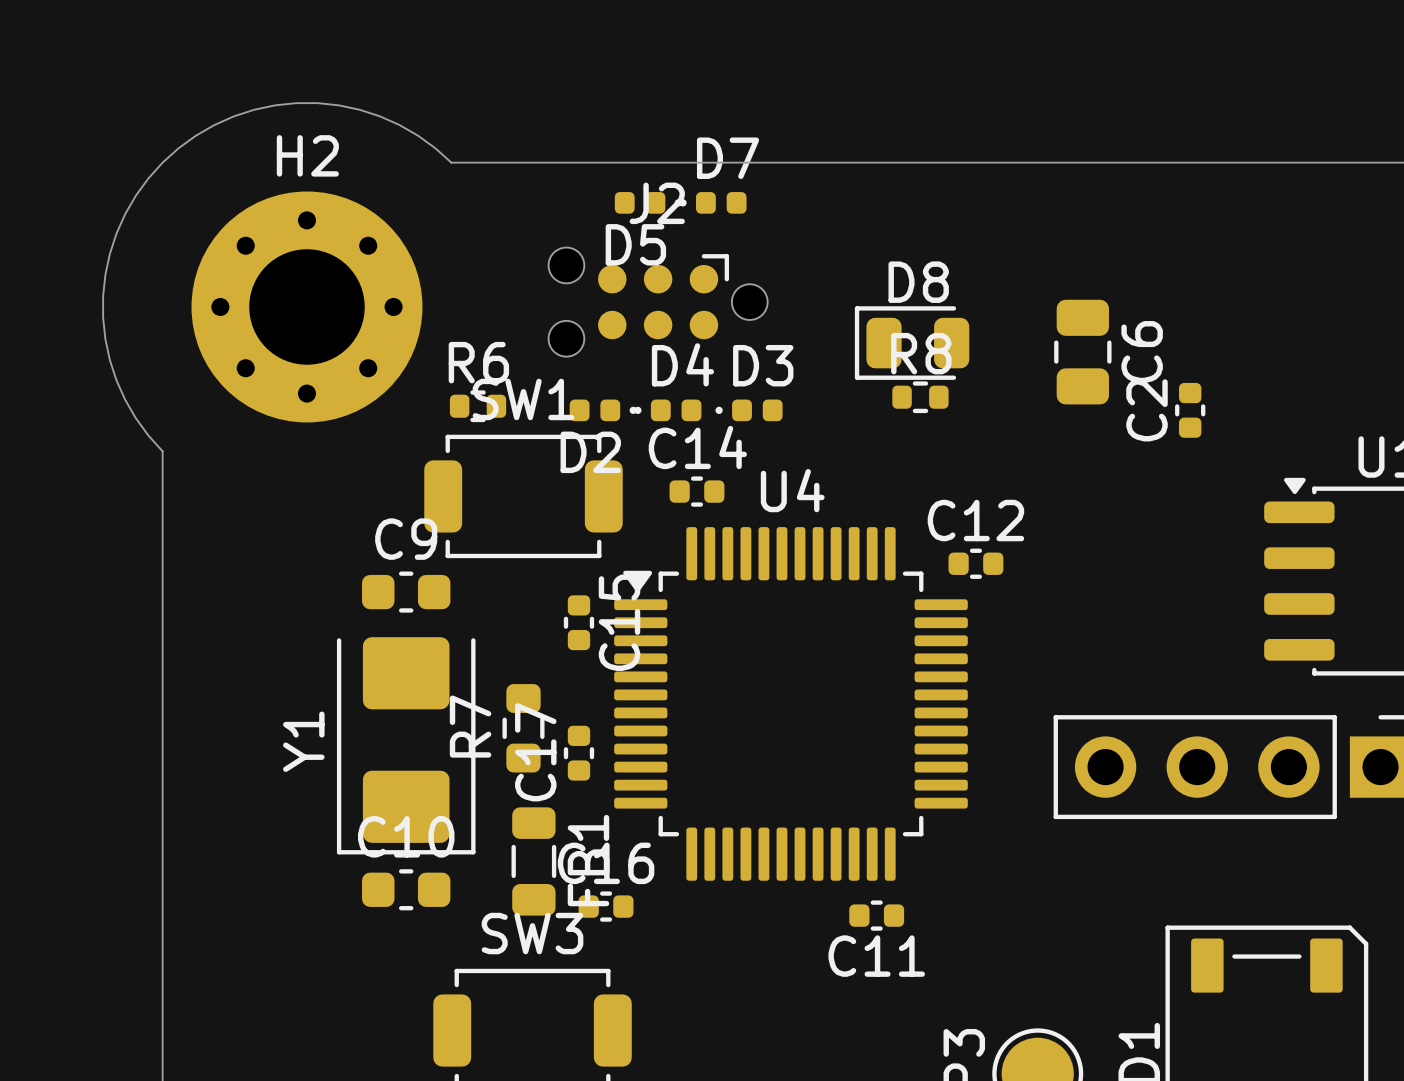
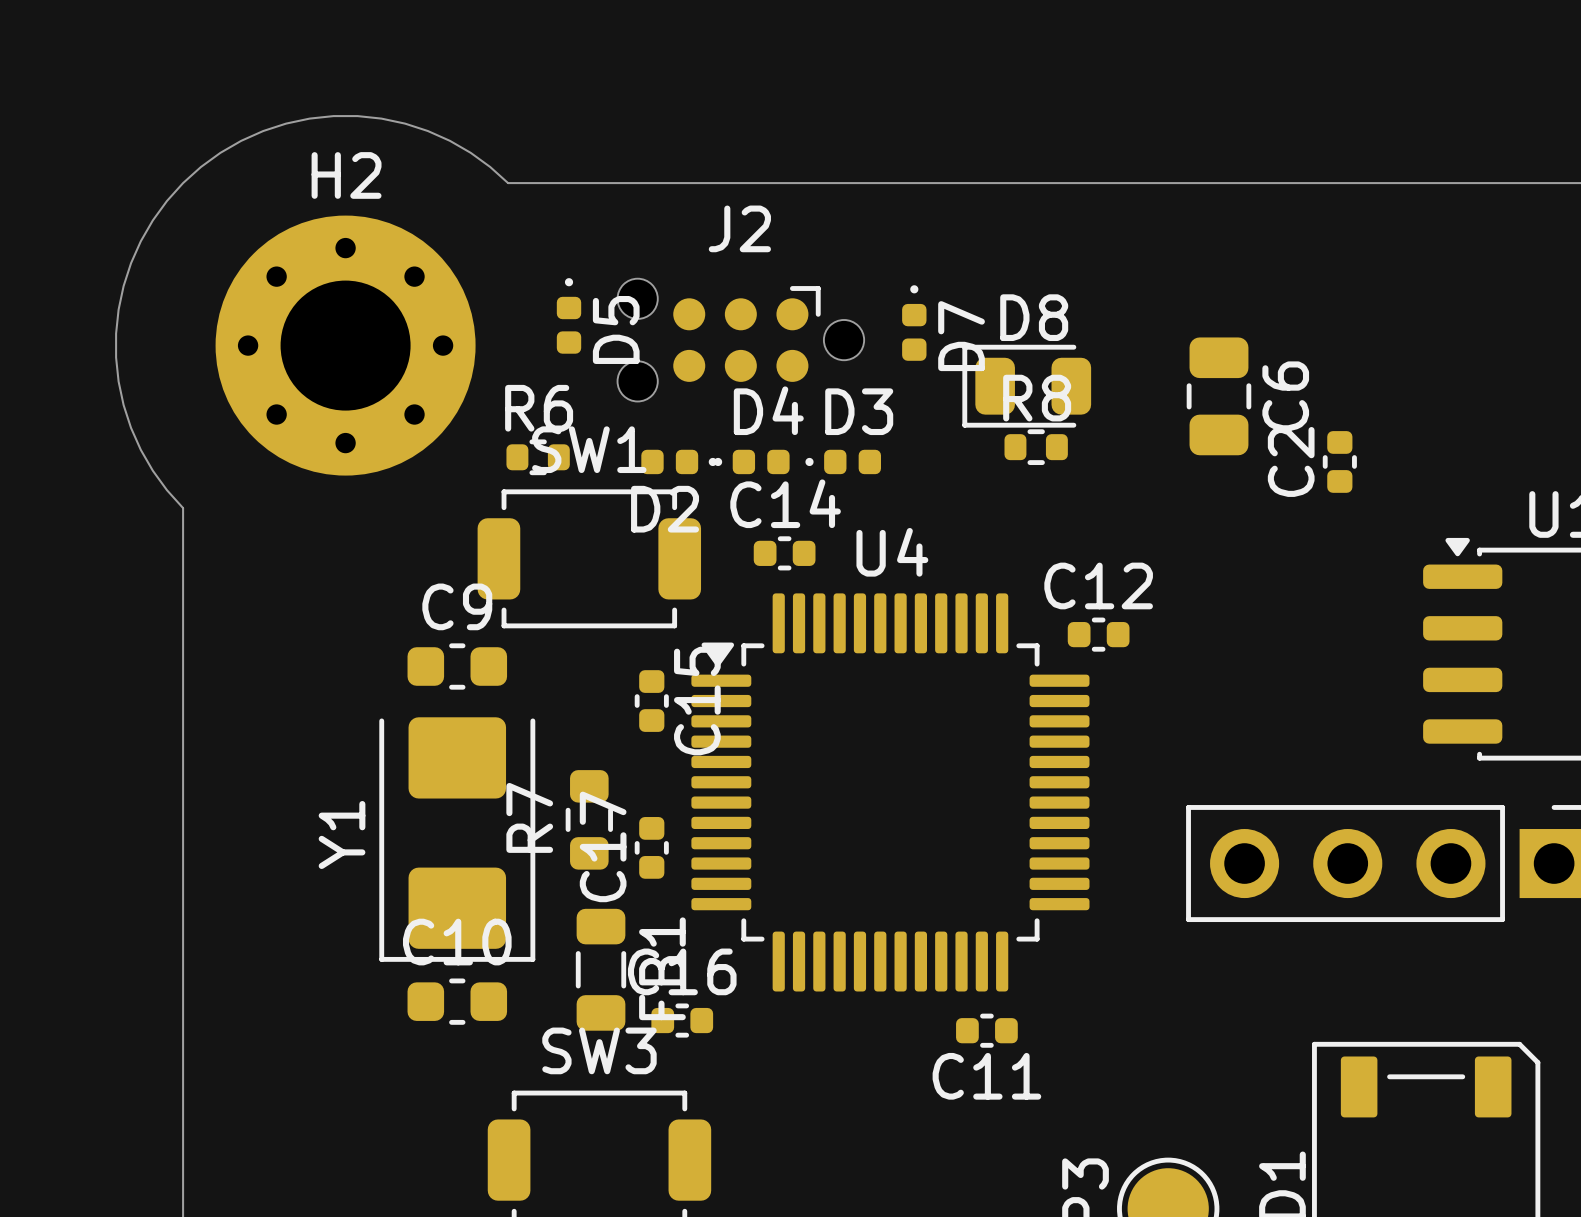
D5 rotation: 0° (648, 202) -> 90° counterclockwise (569, 315)
D5 position: (648, 202) -> (569, 315)
D7 rotation: 0° (712, 202) -> 90° clockwise (914, 323)
D7 position: (712, 202) -> (914, 323)

